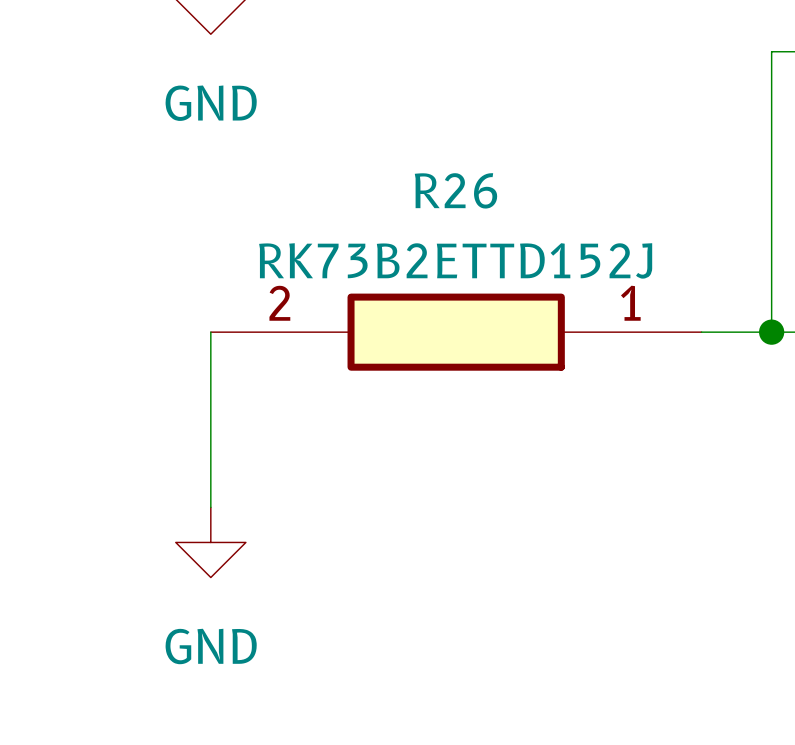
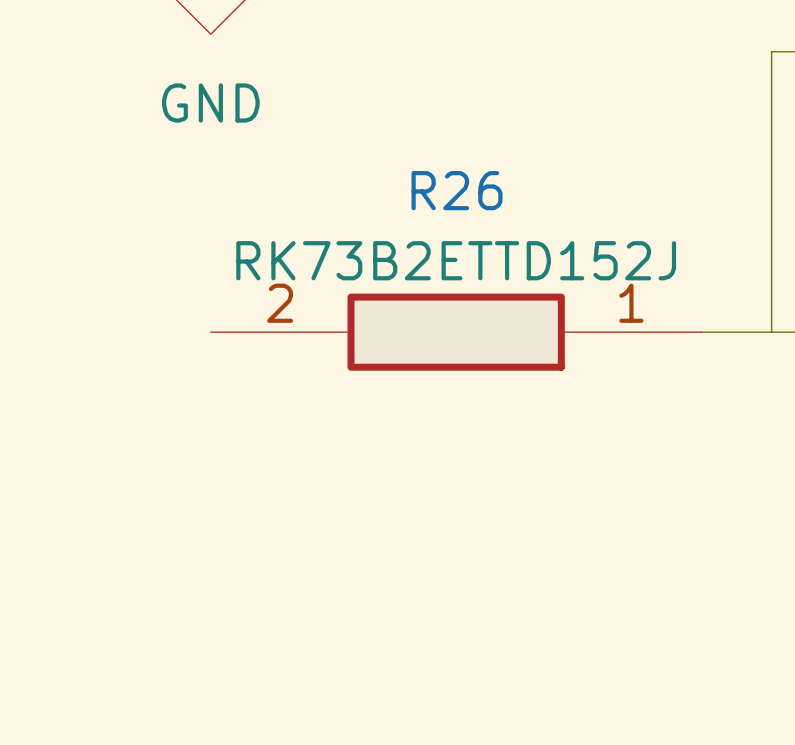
wire: (210, 332) (210, 507) -> none
junction: (771, 332) -> none
power symbol: GND (210, 542) -> none

